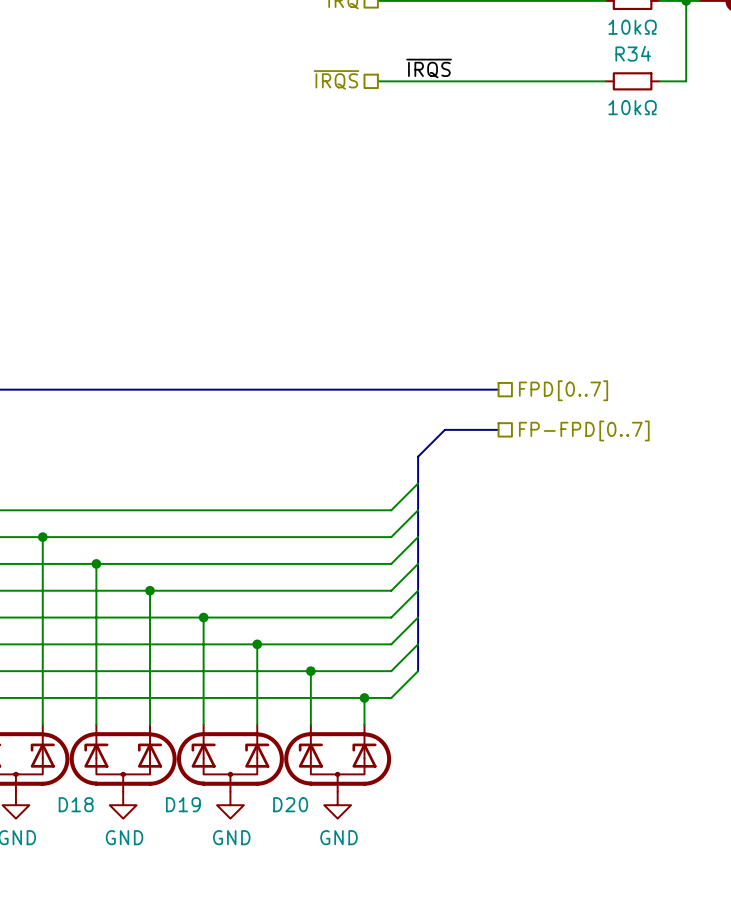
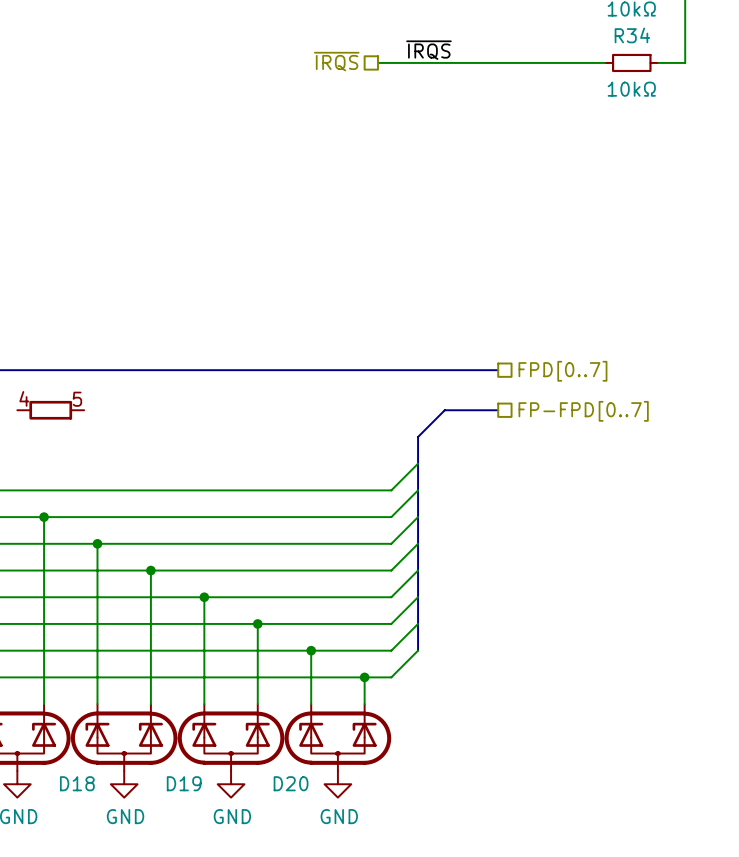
part: none -> (50, 410)

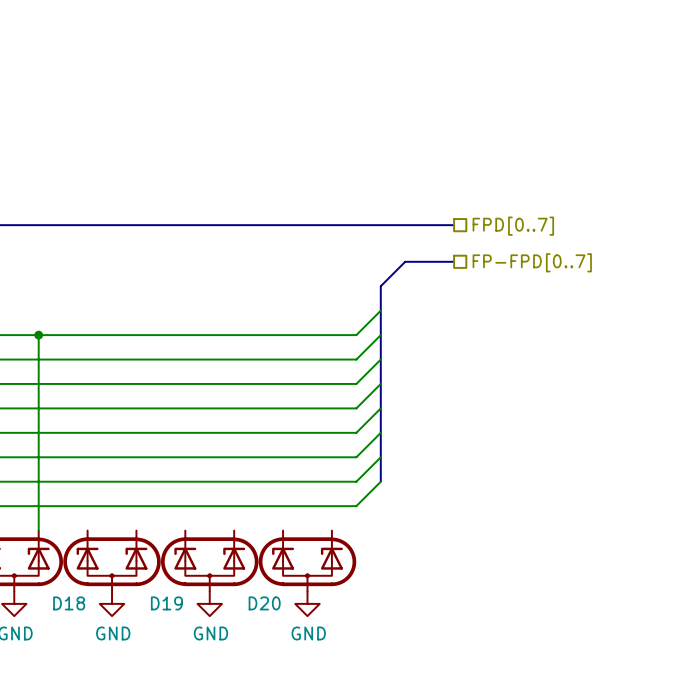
part: (50, 410) -> none
wire: none -> (38, 335) (38, 359)
junction: none -> (38, 335)
junction: (44, 517) -> none
wire: (97, 543) (97, 704) -> none
junction: (97, 543) -> none
wire: (150, 570) (150, 704) -> none
junction: (150, 570) -> none
wire: (204, 597) (204, 704) -> none
junction: (204, 597) -> none
wire: (257, 623) (257, 704) -> none
junction: (257, 623) -> none
wire: (311, 650) (311, 704) -> none
junction: (311, 650) -> none
wire: (364, 677) (364, 704) -> none
junction: (364, 677) -> none

